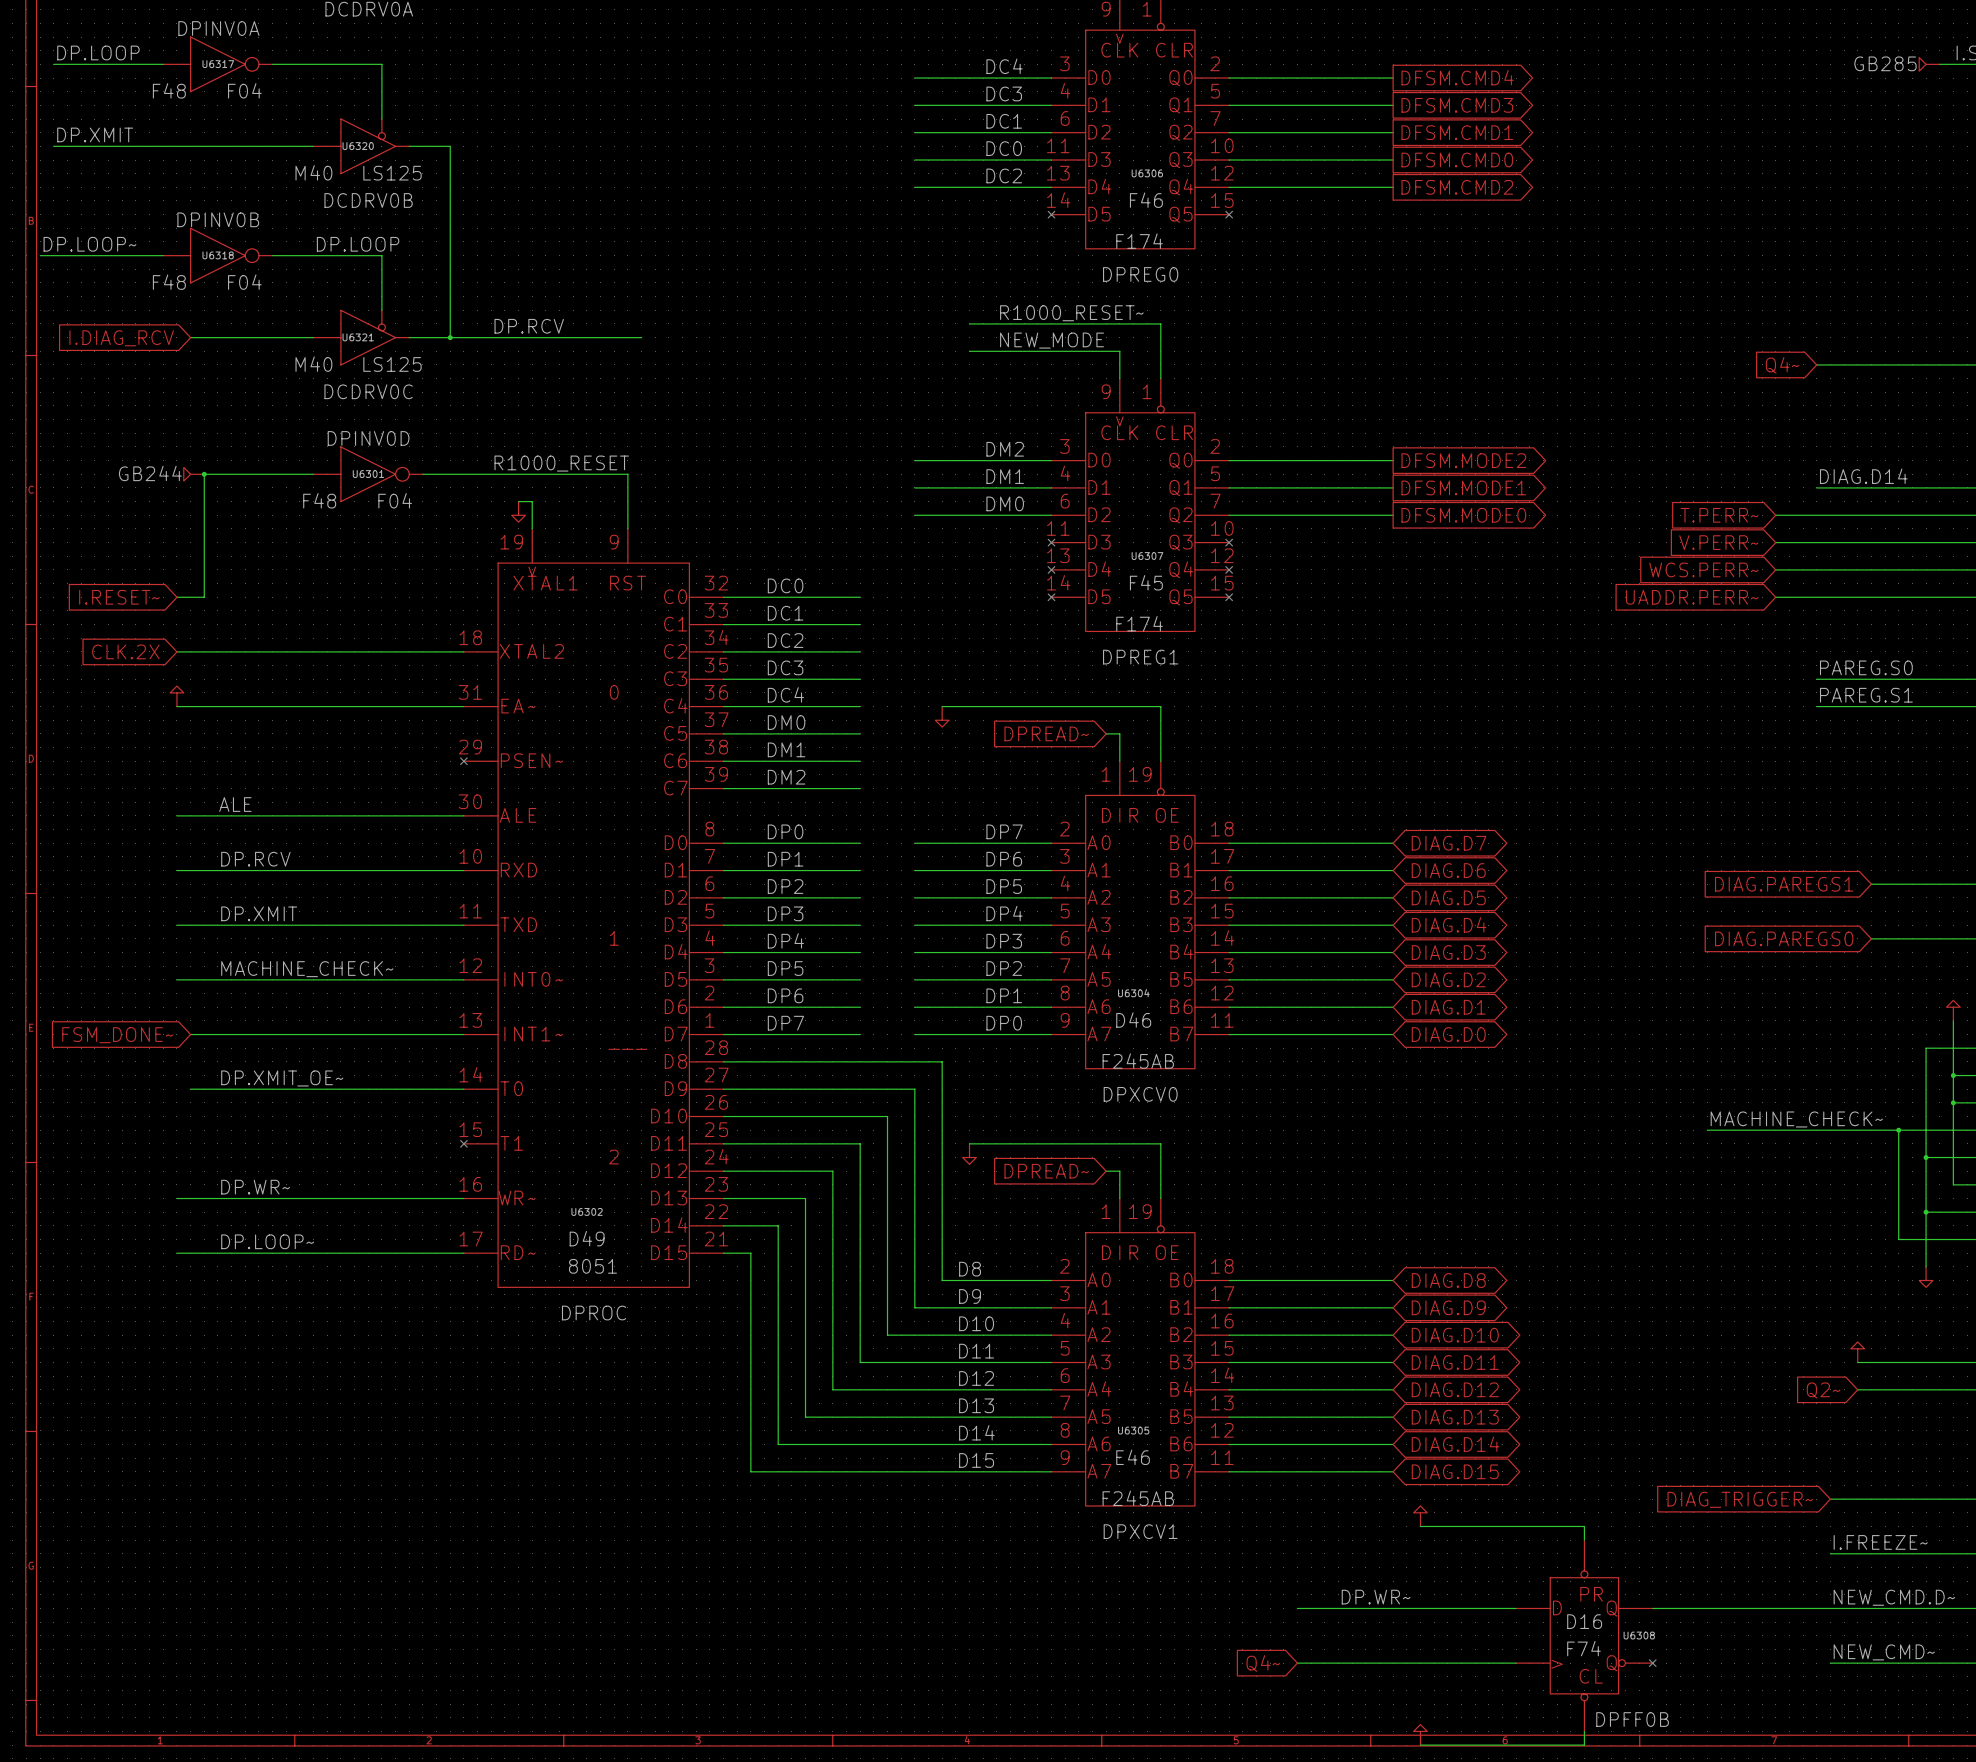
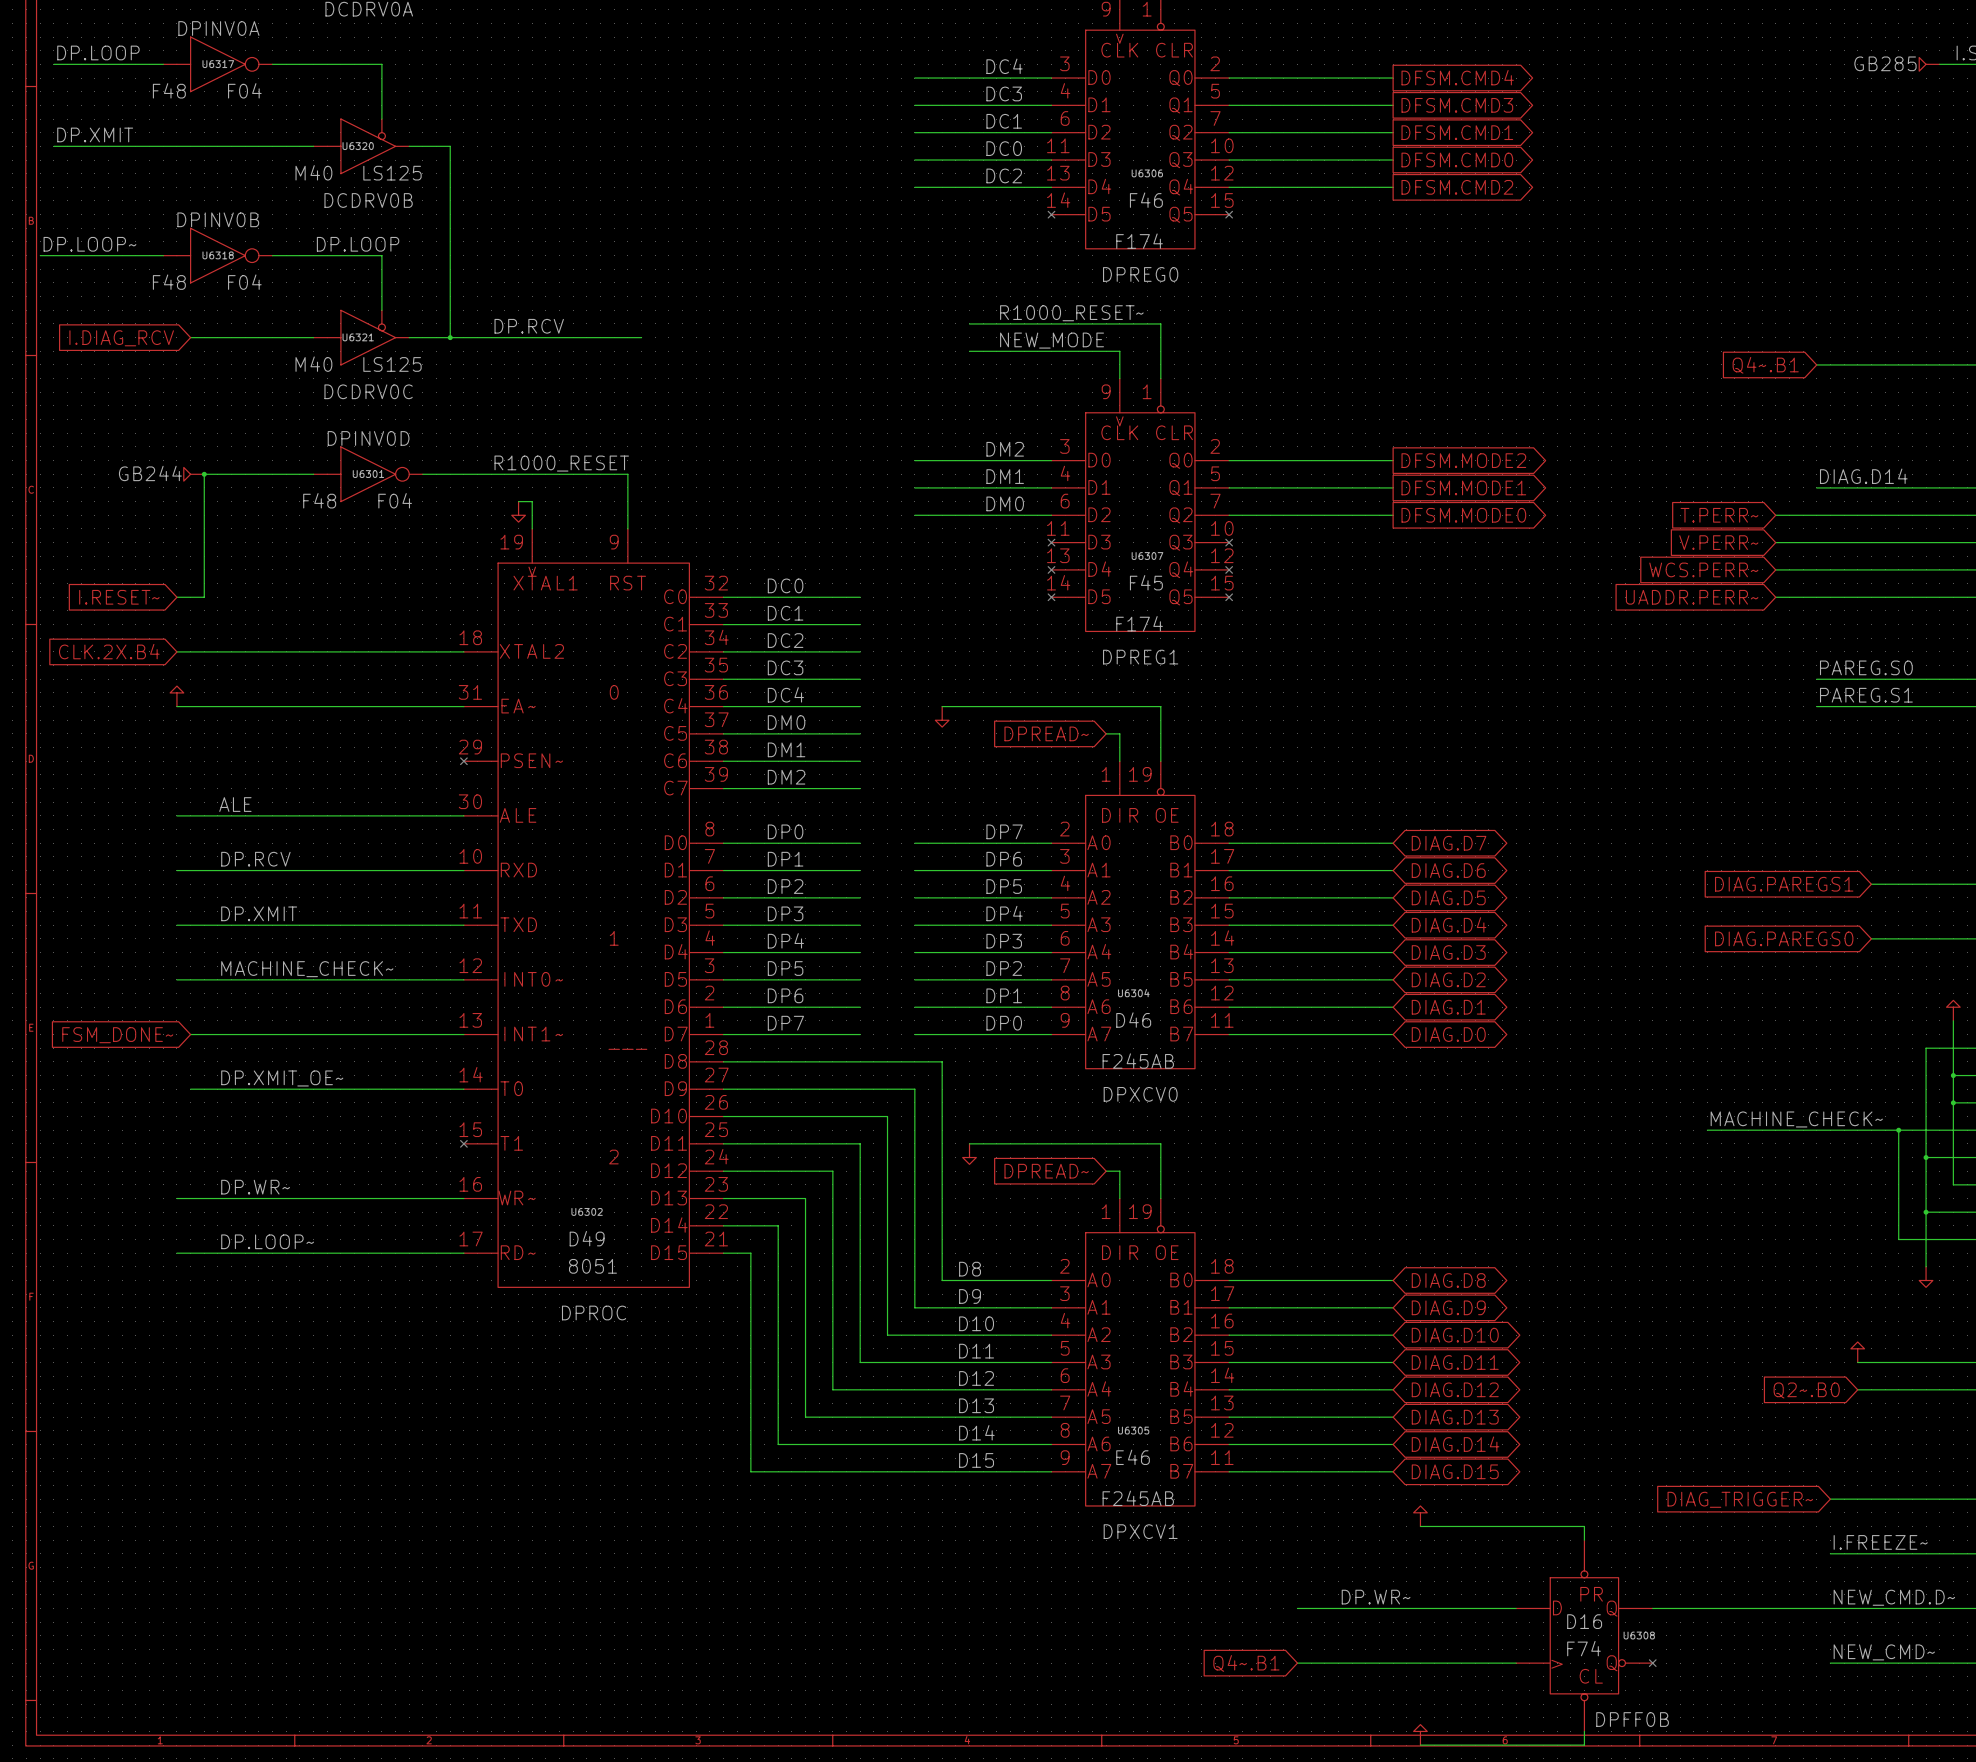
global label: Q4~ (1782, 365) -> Q4~.B1 (1765, 365)
global label: CLK.2X (125, 651) -> CLK.2X.B4 (109, 651)
global label: Q2~ (1823, 1390) -> Q2~.B0 (1806, 1390)
global label: Q4~ (1263, 1663) -> Q4~.B1 (1246, 1663)

